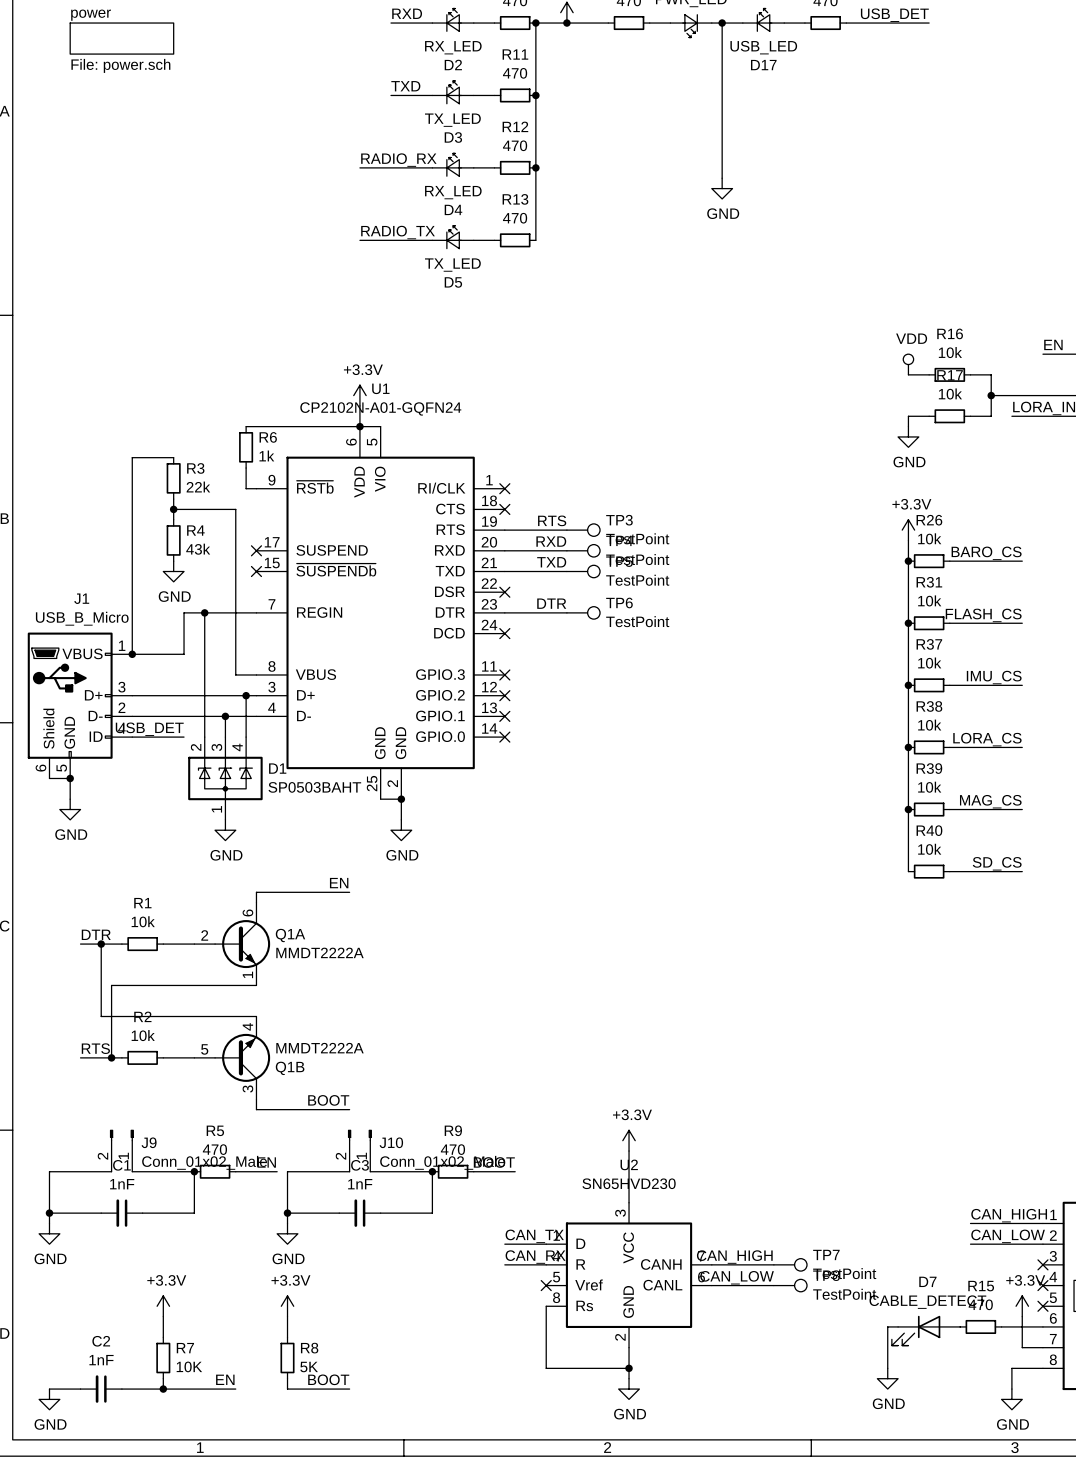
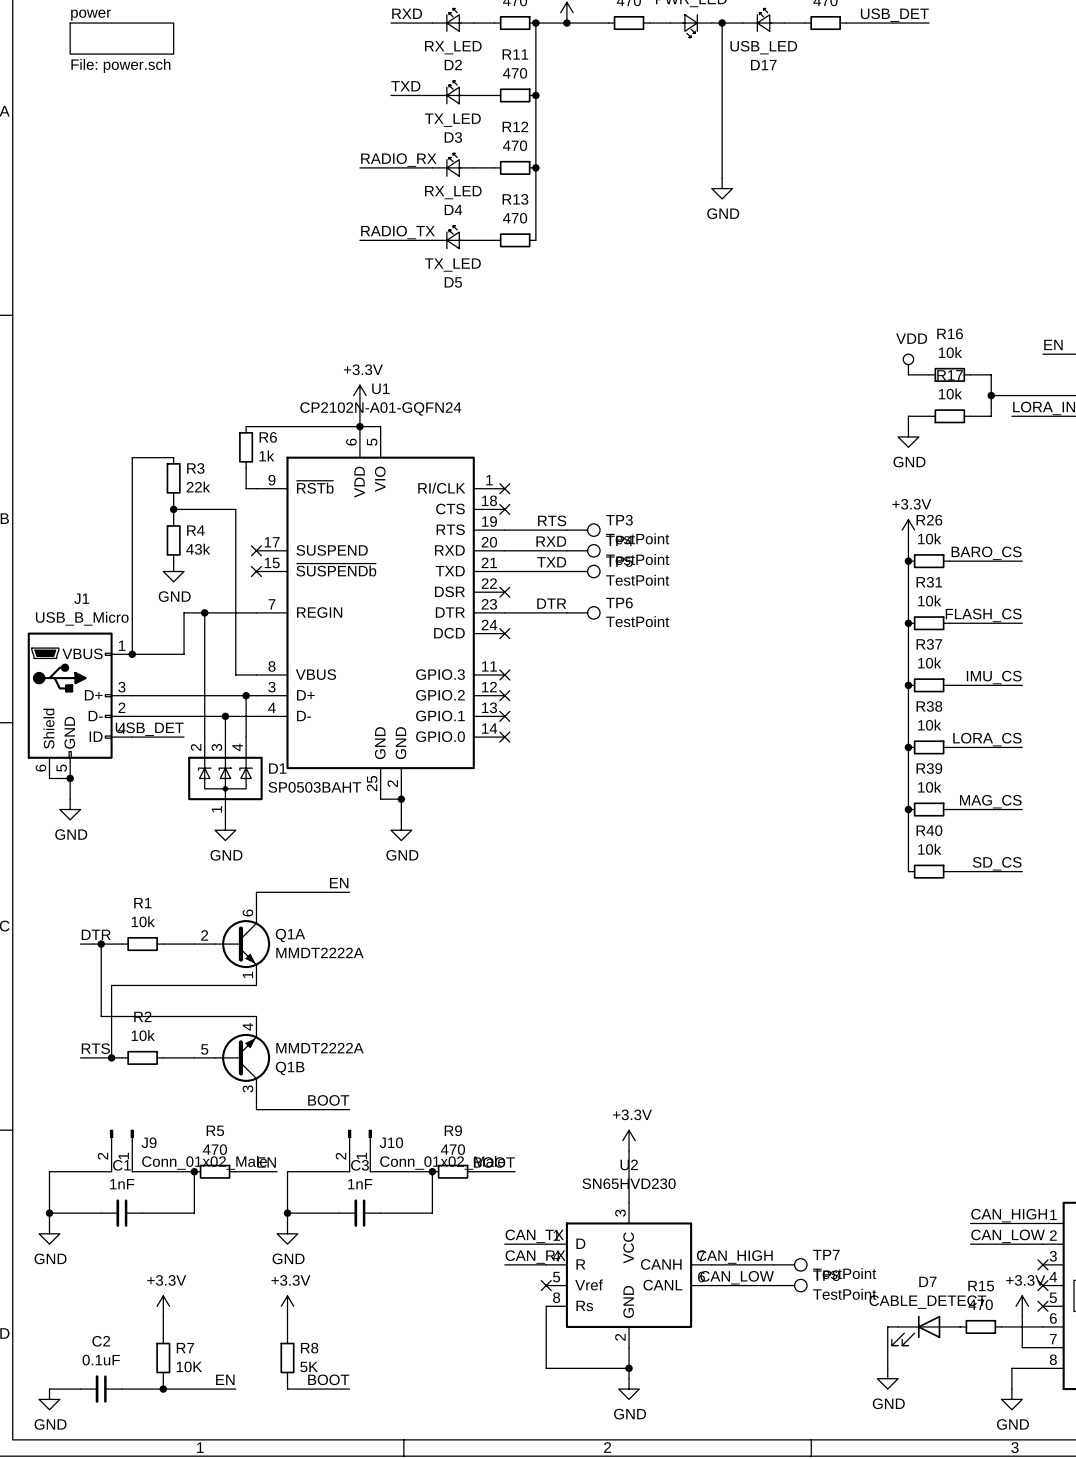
C2 value: 1nF (101, 1360) -> 0.1uF (101, 1360)

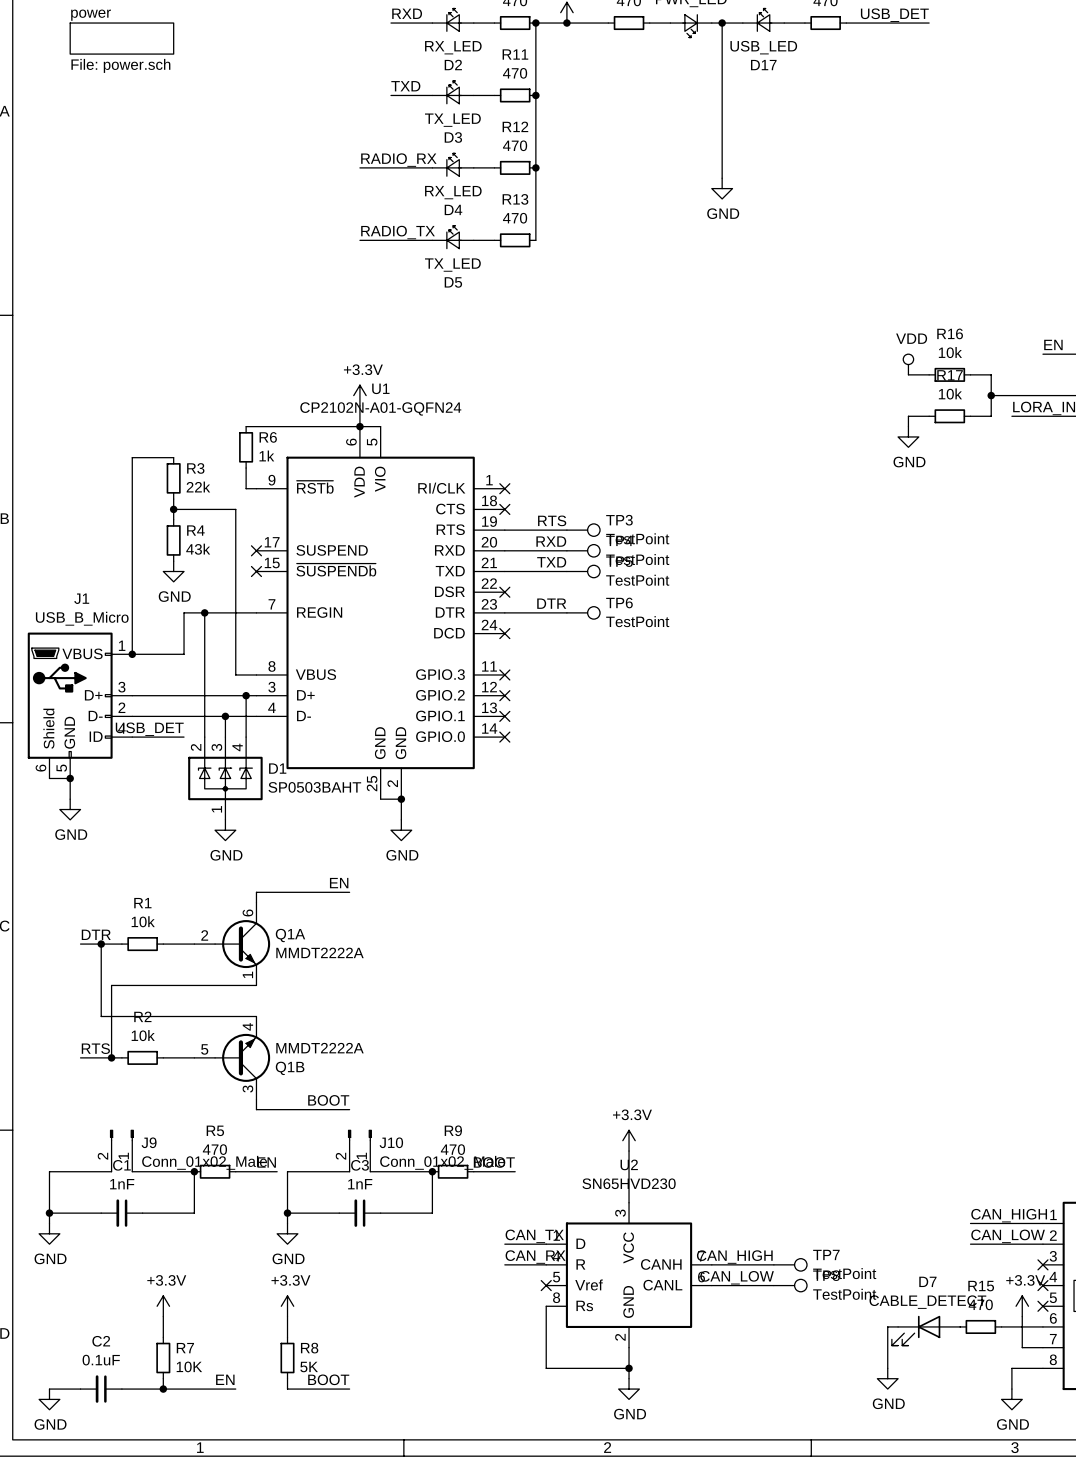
power symbol: +3.3V (908, 530) -> none
wire: (908, 540) (908, 871) -> none
label: BARO_CS (986, 553) -> none
junction: (908, 561) -> none
R26: 10k (929, 561) -> none
wire: (949, 561) (1022, 561) -> none
label: FLASH_CS (983, 615) -> none
junction: (908, 623) -> none
R31: 10k (929, 623) -> none
wire: (949, 623) (1022, 623) -> none
label: IMU_CS (994, 677) -> none
junction: (908, 685) -> none
R37: 10k (929, 685) -> none
wire: (949, 685) (1022, 685) -> none
label: LORA_CS (987, 739) -> none
junction: (908, 747) -> none
R38: 10k (929, 747) -> none
wire: (949, 747) (1022, 747) -> none
label: MAG_CS (990, 801) -> none
junction: (908, 809) -> none
R39: 10k (929, 809) -> none
wire: (949, 809) (1022, 809) -> none
label: SD_CS (997, 863) -> none
R40: 10k (929, 871) -> none
wire: (949, 871) (1022, 871) -> none

